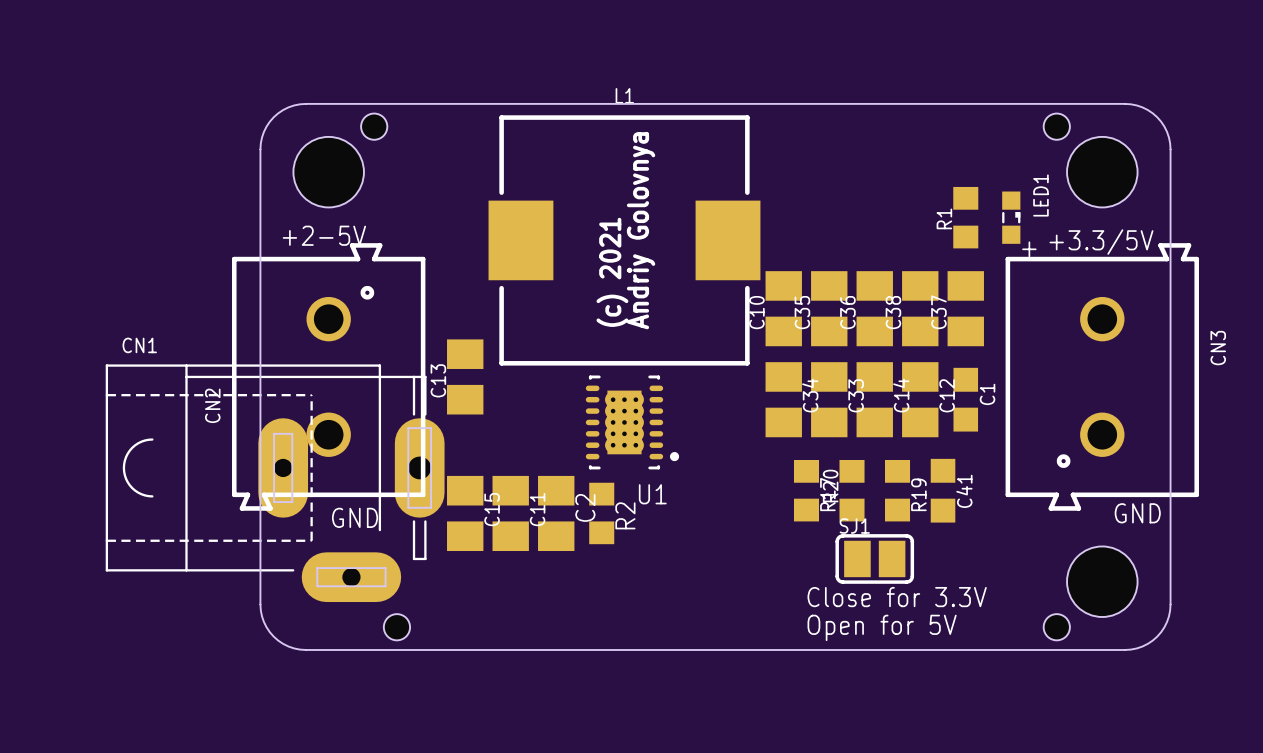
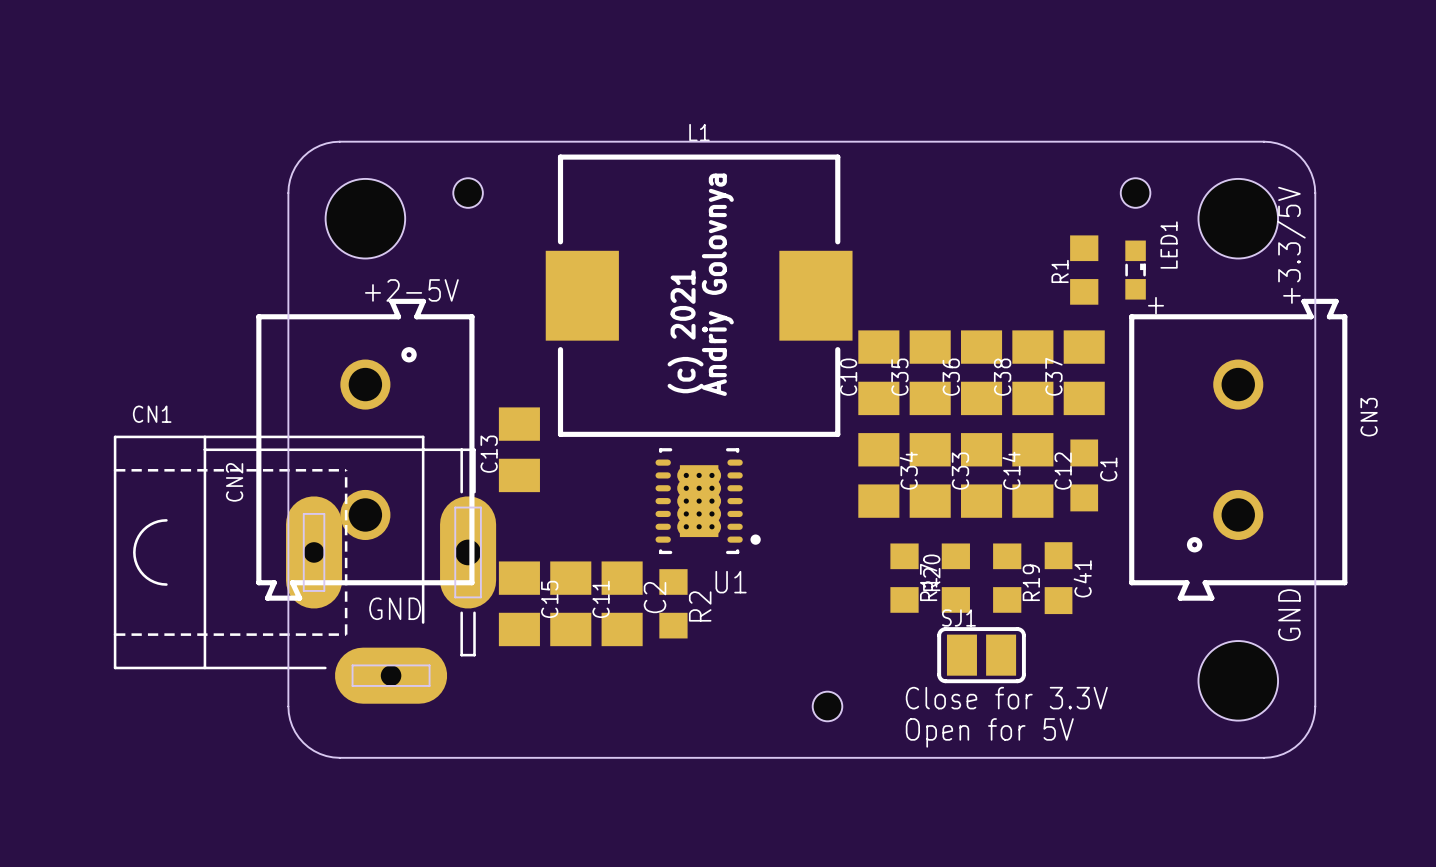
part position: (374, 126) -> (468, 193)
part position: (1056, 126) -> (1135, 193)
text position: +2-5V (324, 235) -> +2-5V (411, 290)
text rotation: 0° (1101, 242) -> 90° counterclockwise (1291, 245)
text rotation: 0° (1137, 513) -> 90° counterclockwise (1289, 615)
part: none -> (827, 706)
part: (396, 627) -> none
part: (1056, 627) -> none

